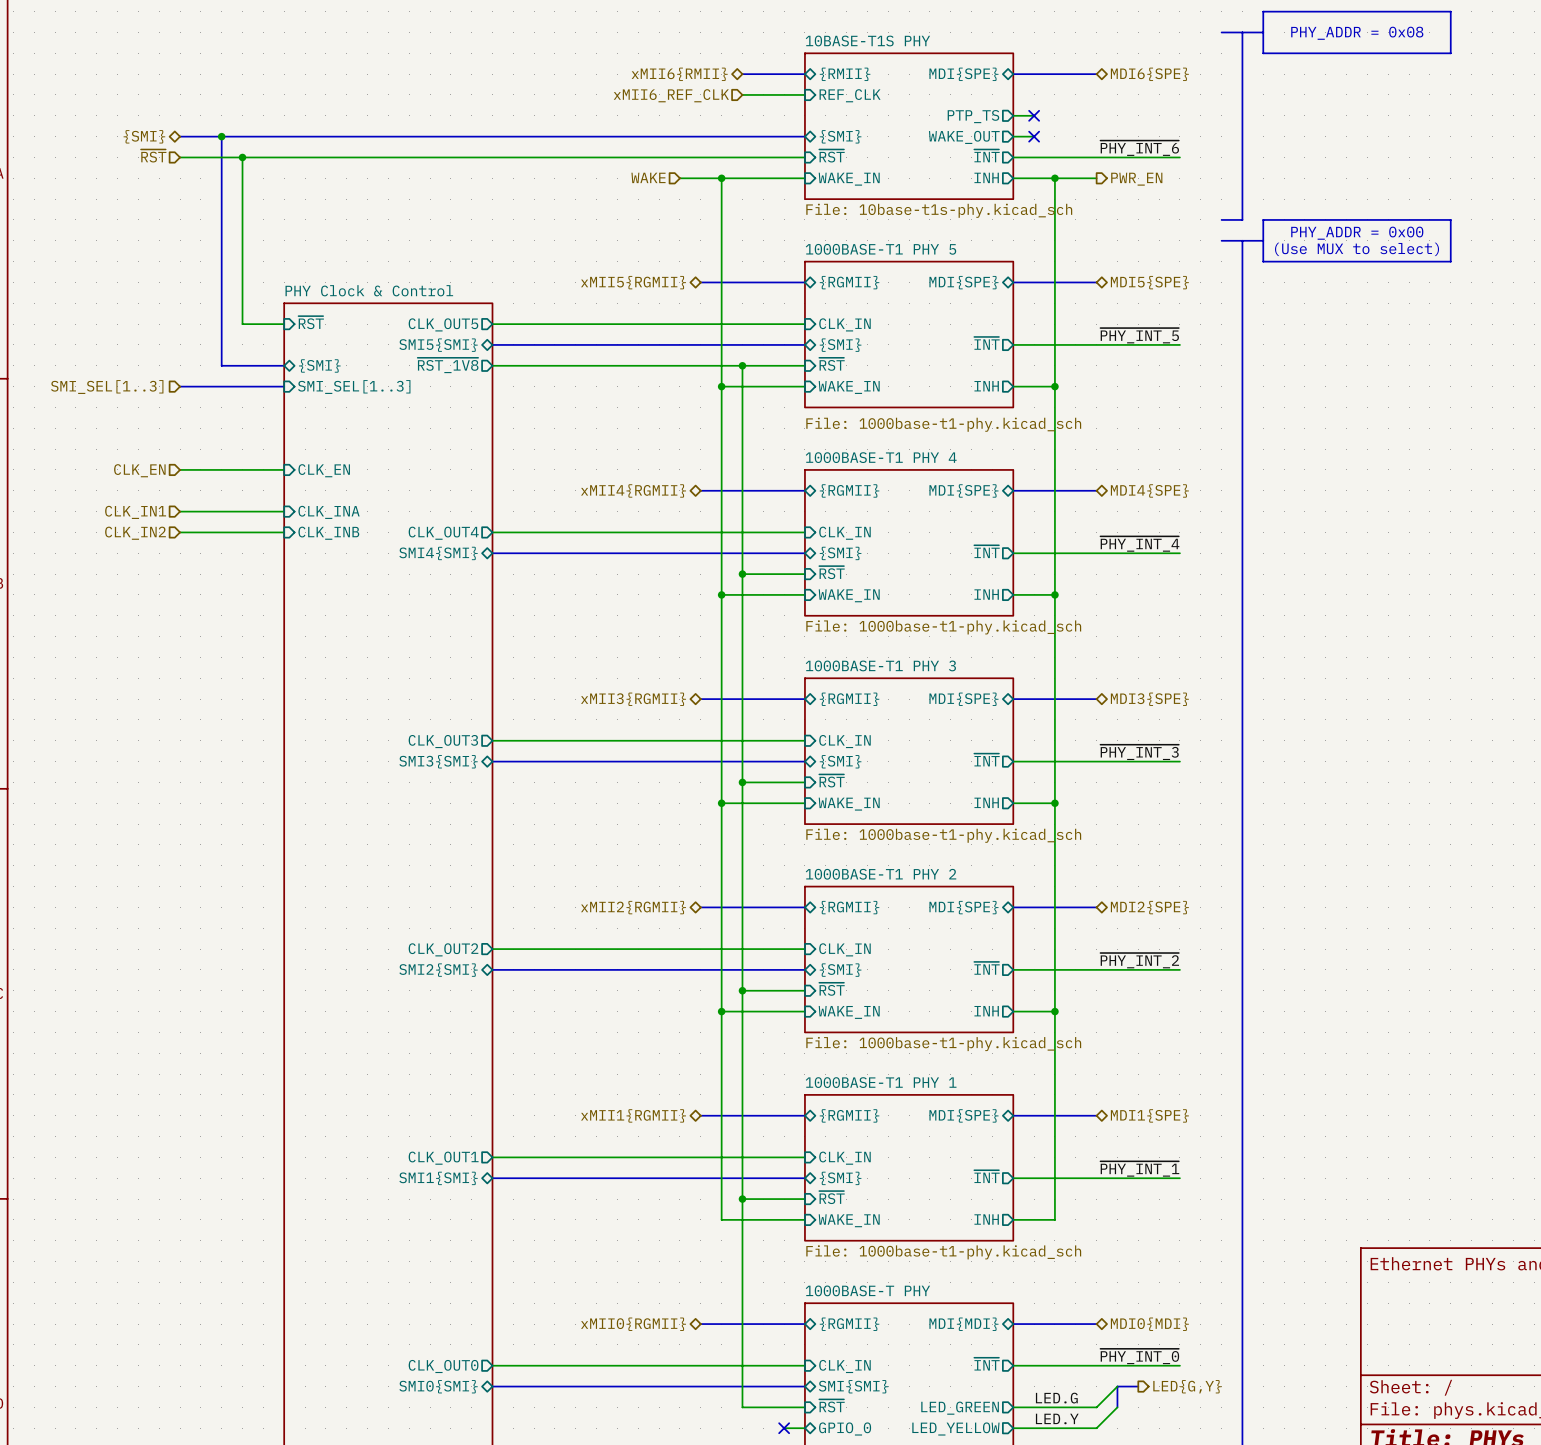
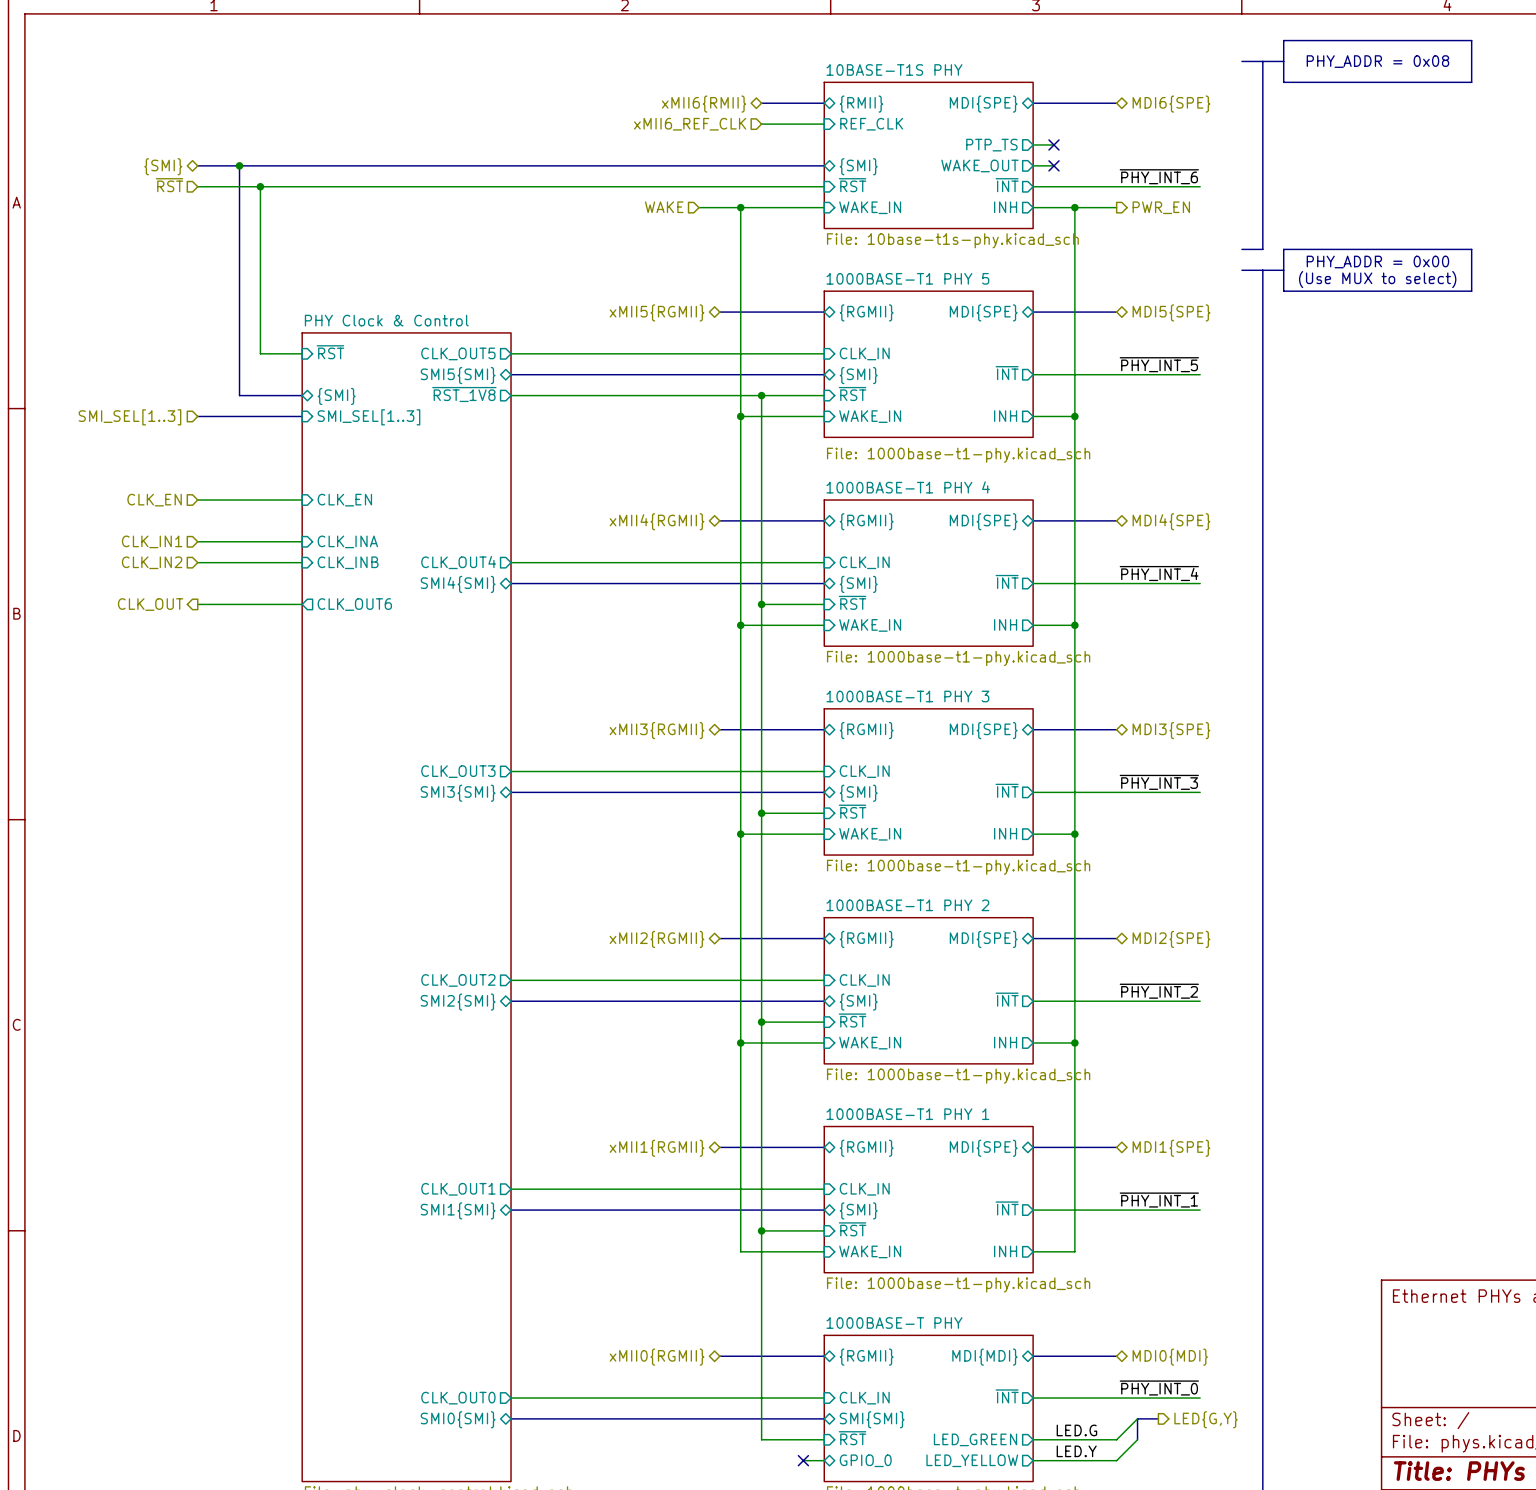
hierarchical label: none -> CLK_OUT (150, 604)
wire: none -> (197, 604) (302, 604)
sheet pin: none -> CLK_OUT6 (354, 604)

